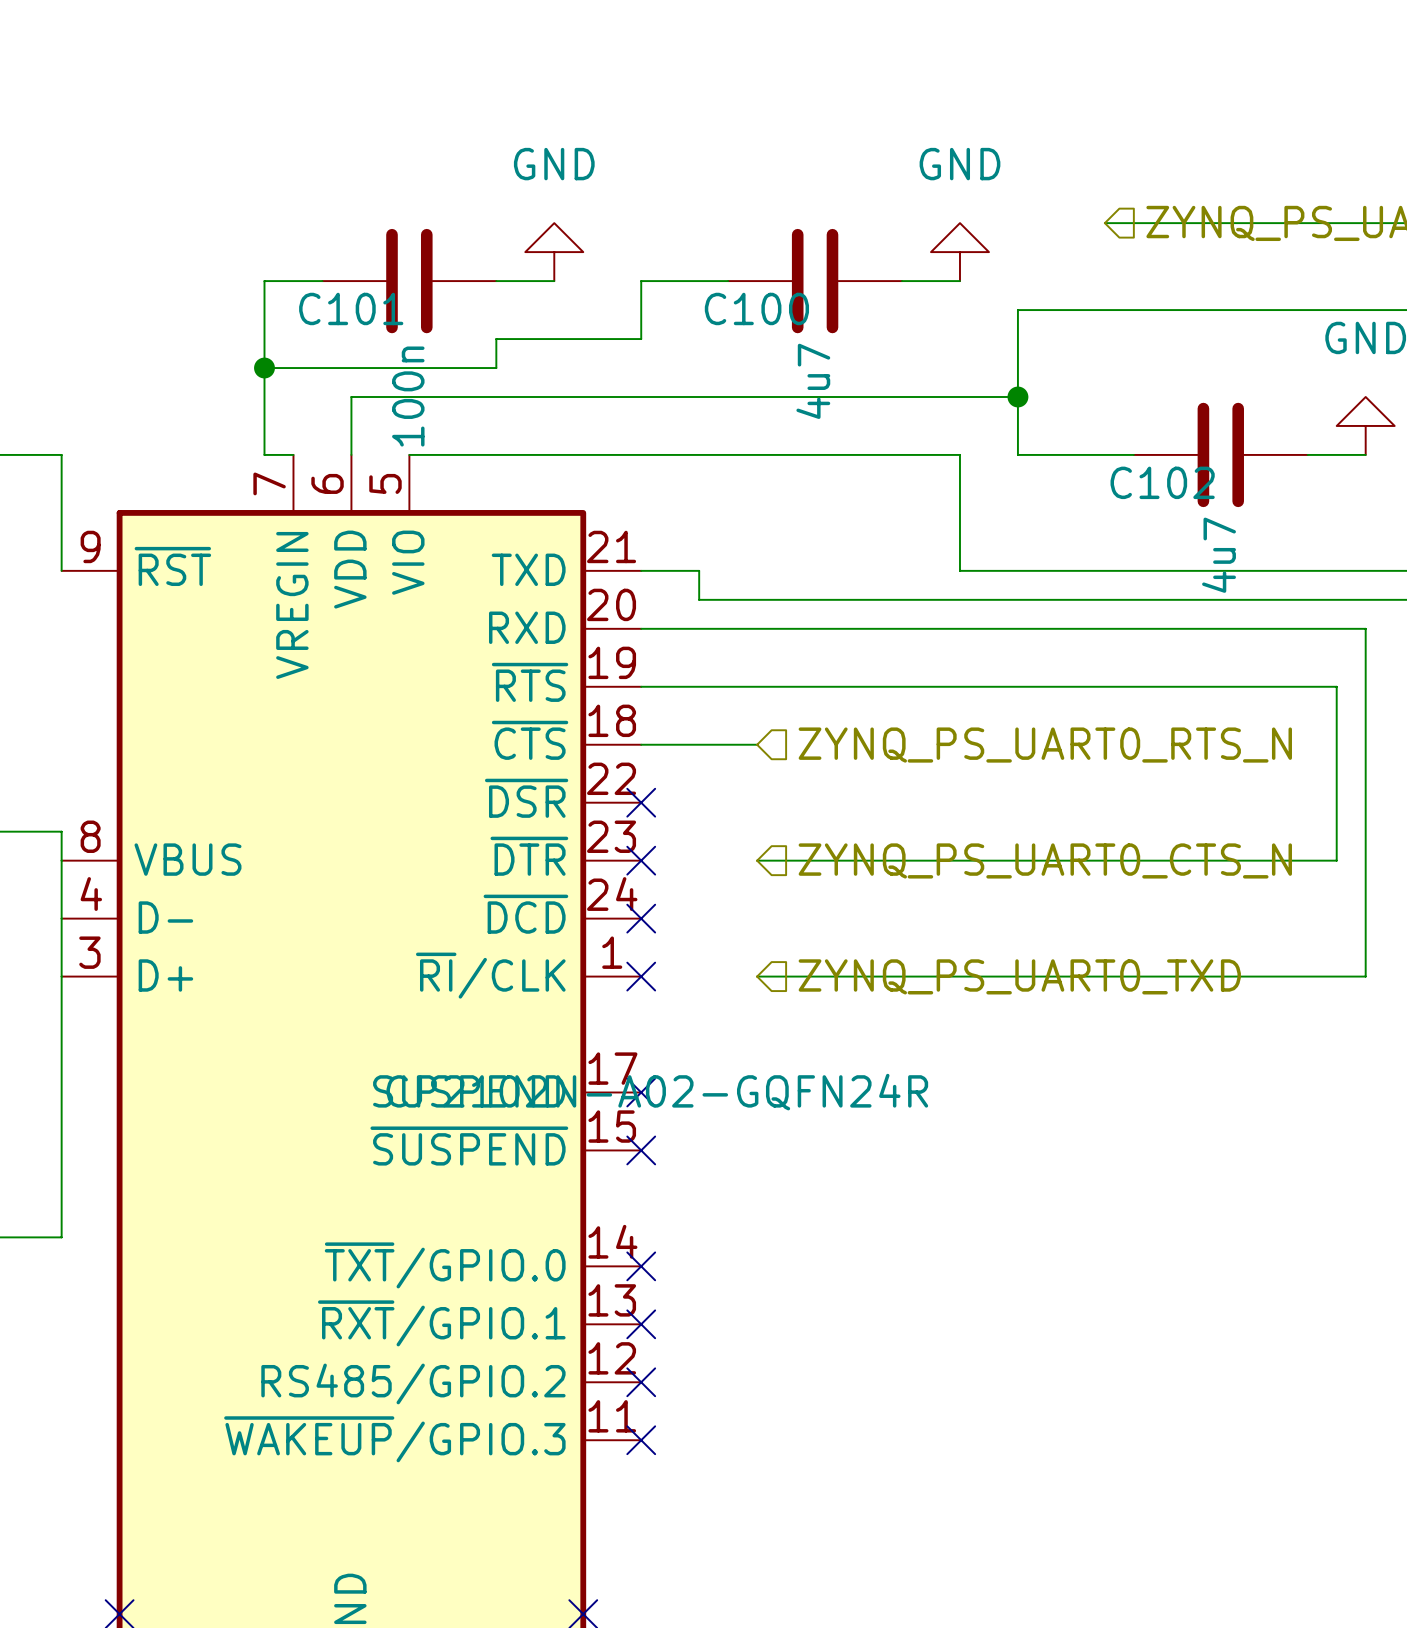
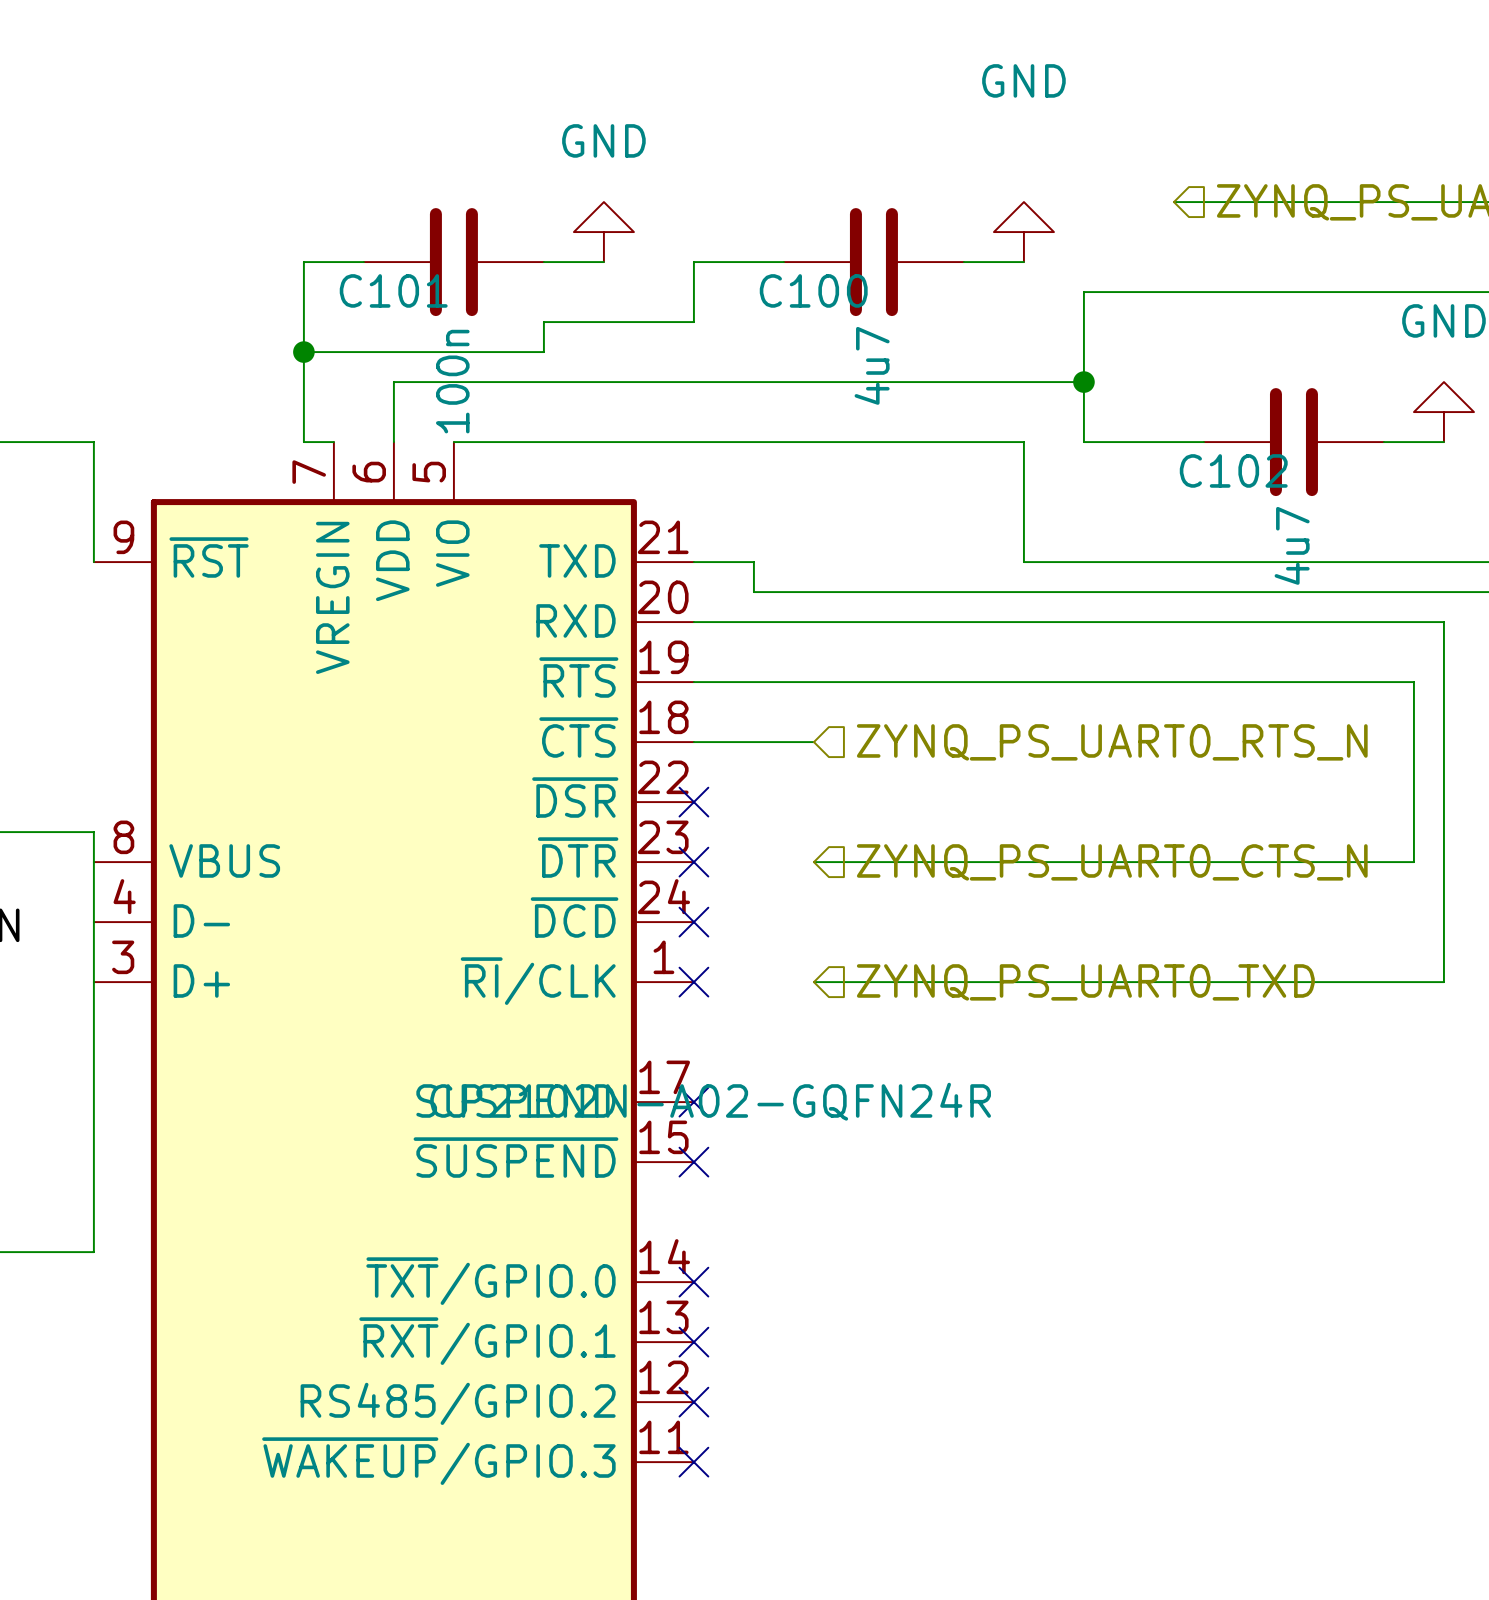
power symbol text position: GND (959, 164) -> GND (1023, 80)

